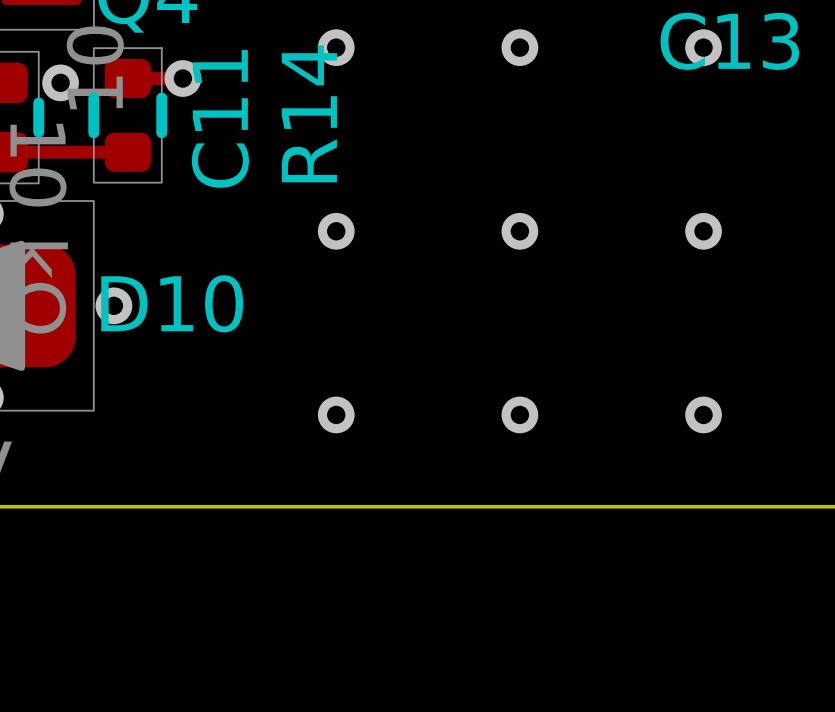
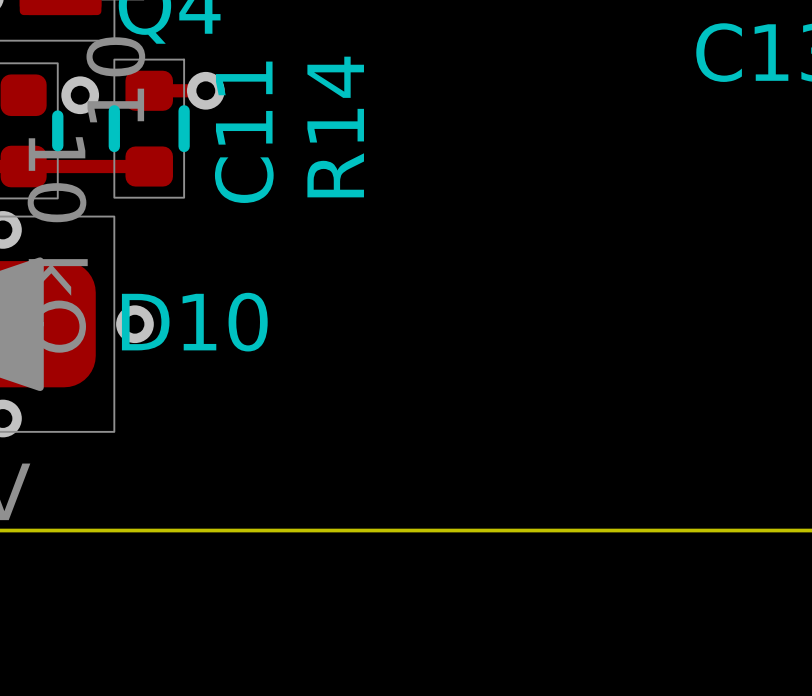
via: (336, 47) -> none
via: (519, 47) -> none
via: (703, 47) -> none
via: (336, 231) -> none
via: (519, 231) -> none
via: (703, 231) -> none
via: (336, 414) -> none
via: (519, 414) -> none
via: (703, 414) -> none

